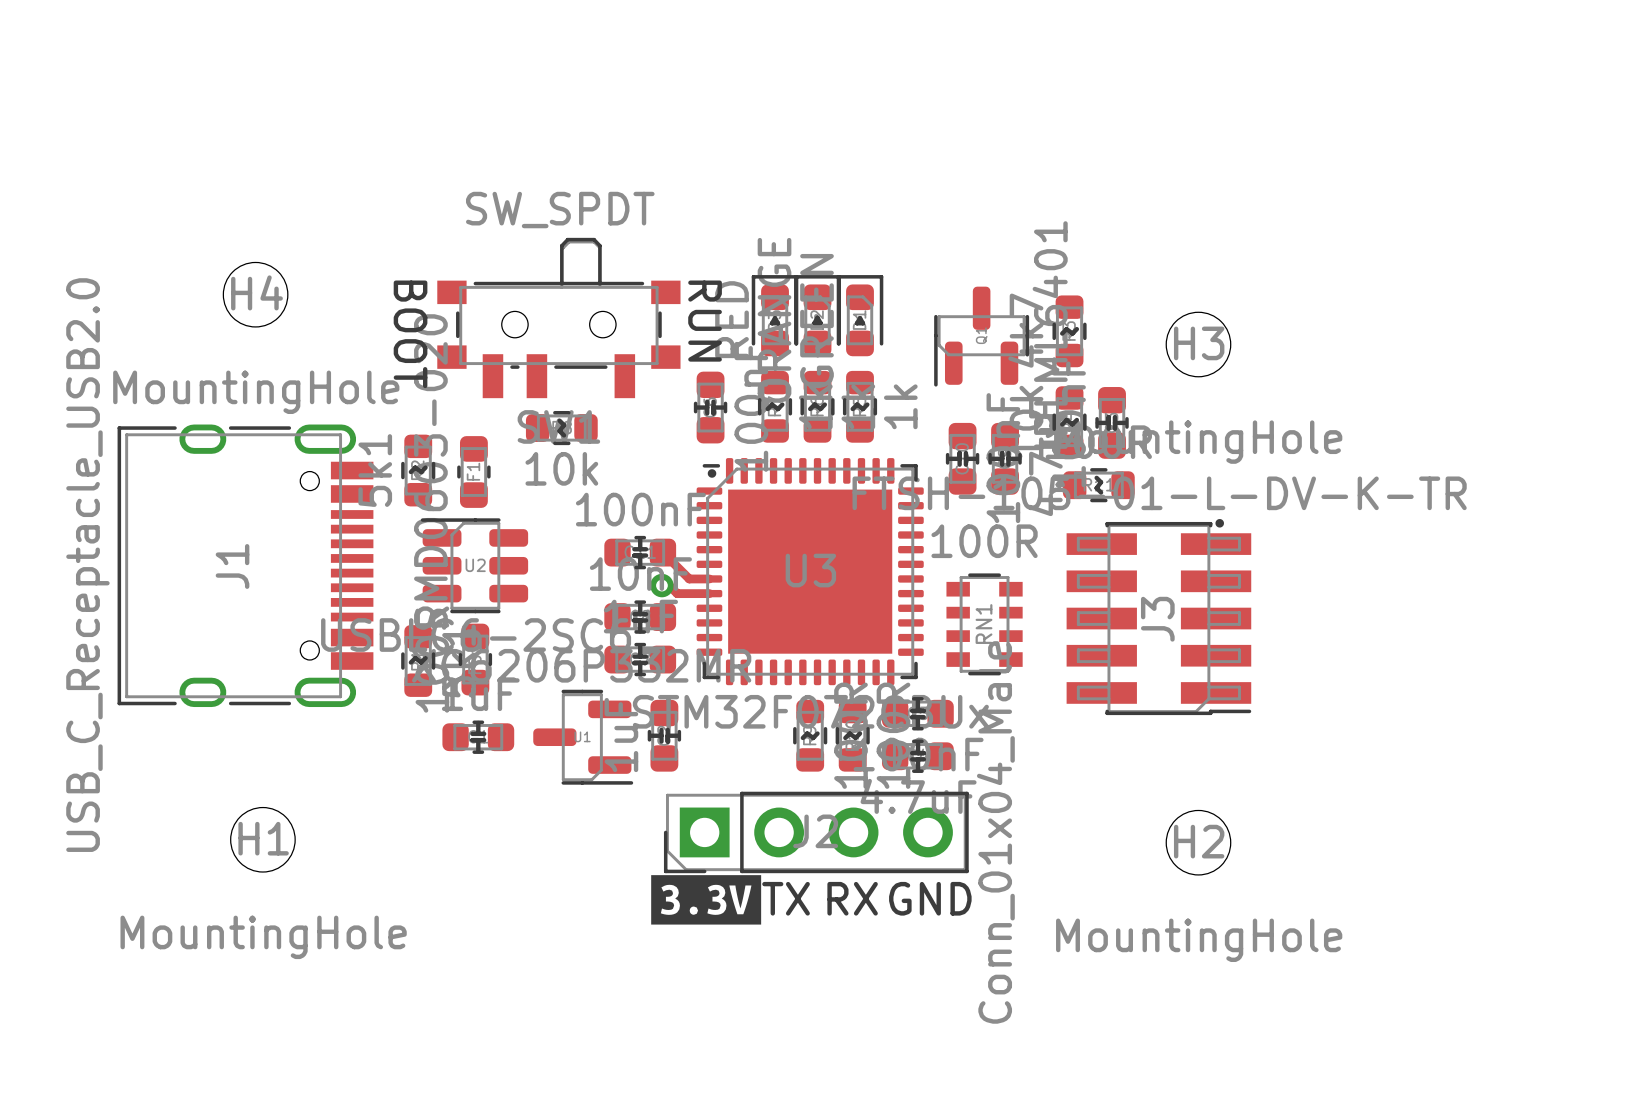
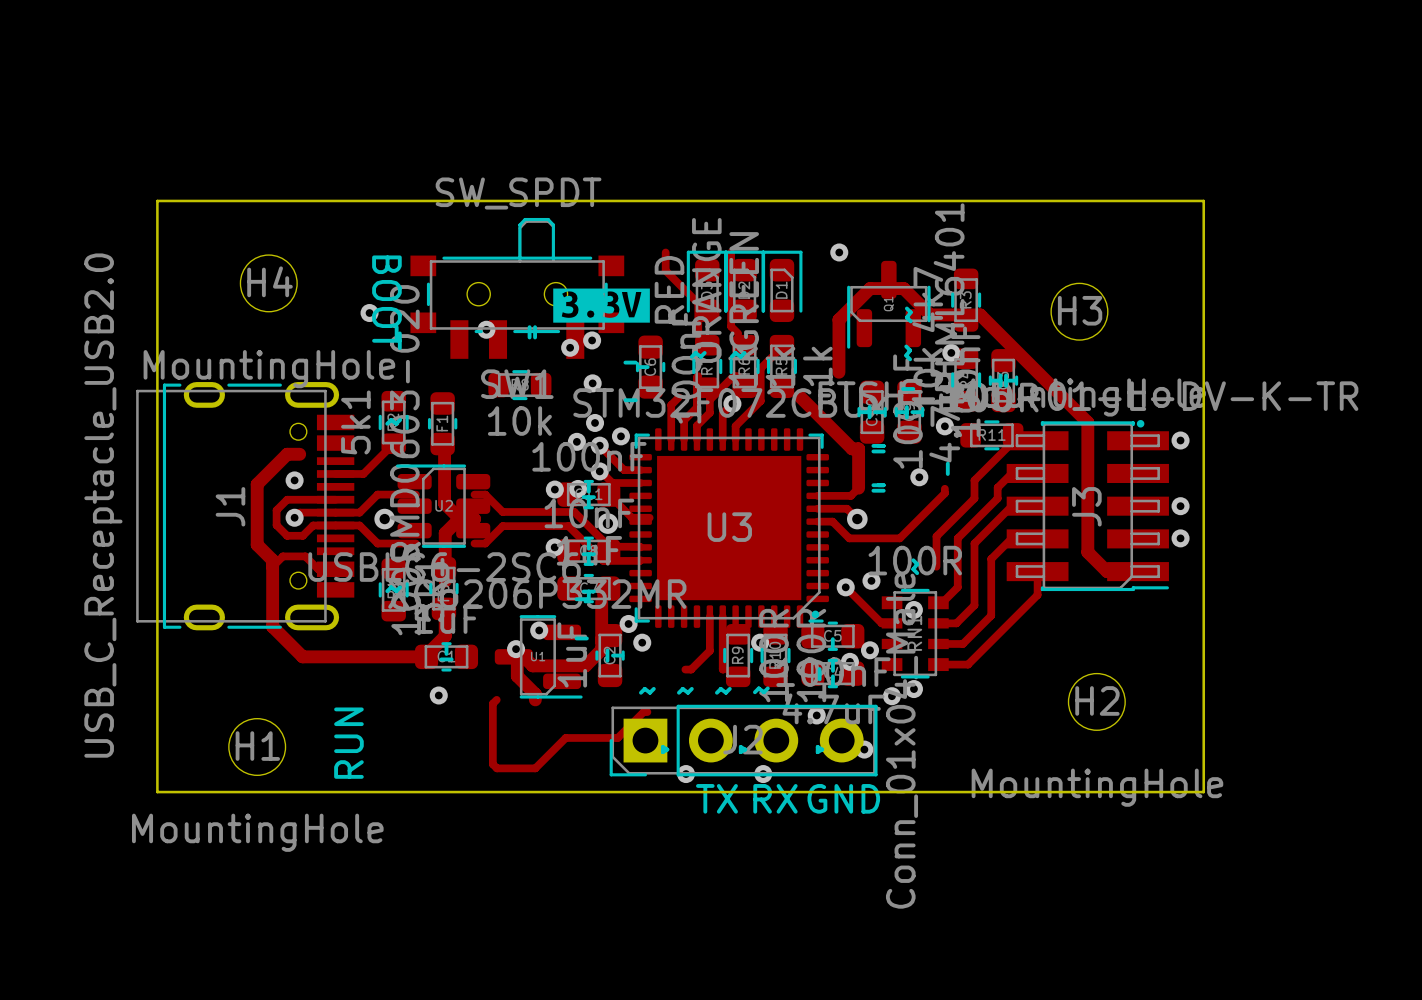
board edge: none -> (157, 200) (1203, 200) (1203, 792) (157, 792) (157, 200)
track: none -> (665, 252) (665, 270) (698, 303) (698, 333)
track: none -> (731, 252) (731, 326) (738, 333)
via: none -> (839, 252)
H4 position: (255, 294) -> (268, 283)
line: (817, 317) (814, 322) (820, 322) (817, 317) -> none
drawing: none -> [553, 288, 650, 323]
line: (775, 318) (777, 323) (772, 323) (775, 318) -> none
line: (860, 318) (857, 323) (862, 323) (860, 318) -> none
text rotation: 0° (705, 321) -> 180° (348, 743)
text position: RUN (705, 321) -> RUN (348, 743)
line: (1076, 329) (1072, 333) (1066, 329) (1062, 333) -> none
via: none -> (369, 313)
via: none -> (486, 329)
via: none -> (592, 340)
via: none -> (570, 347)
track: none -> (790, 347) (781, 347) (760, 368) (760, 401) (735, 426) (735, 439)
via: none -> (951, 352)
line: (707, 401) (707, 413) -> (529, 327) (529, 337)
line: (713, 401) (713, 413) -> (535, 327) (535, 337)
line: (782, 404) (777, 408) (772, 404) (767, 408) -> (704, 352) (700, 356) (695, 352) (691, 356)
line: (824, 404) (820, 408) (814, 404) (810, 408) -> (744, 352) (740, 356) (735, 352) (731, 356)
line: (867, 404) (862, 408) (857, 404) (852, 408) -> (691, 688) (687, 692) (682, 688) (678, 692)
line: (713, 407) (724, 407) -> none
track: none -> (838, 372) (838, 319) (870, 288) (903, 288) (930, 314) (980, 314) (1087, 422) (1087, 552) (1107, 571) (1138, 571)
track: none -> (698, 376) (696, 407) (684, 420) (684, 439)
track: none -> (738, 376) (733, 376) (709, 399) (709, 412) (696, 425) (696, 439)
line: (1076, 419) (1072, 424) (1066, 419) (1062, 424) -> (653, 688) (649, 692) (644, 688) (640, 692)
line: (559, 420) (564, 425) (559, 430) (564, 435) -> (906, 308) (910, 312) (906, 317) (910, 321)
J1 footprint: [117, 424, 374, 708] -> [136, 382, 355, 631]
via: none -> (592, 383)
line: none -> (903, 388) (913, 388)
track: none -> (678, 397) (671, 405) (671, 439)
track: none -> (800, 396) (852, 448) (858, 448) (858, 488) (850, 495) (817, 495)
track: none -> (732, 403) (722, 413) (722, 439)
via: none -> (732, 403)
line: (965, 452) (965, 464) -> (396, 327) (396, 337)
line: (1008, 452) (1008, 464) -> (947, 463) (947, 473)
drawing: [707, 469, 717, 478] -> none
via: none -> (595, 422)
via: none -> (944, 426)
line: (1096, 477) (1101, 482) (1096, 488) (1101, 492) -> (906, 346) (910, 350) (906, 355) (910, 359)
via: none -> (620, 436)
track: none -> (1037, 440) (1014, 440) (974, 480) (974, 498) (936, 536) (936, 566)
via: none -> (1180, 440)
via: none -> (576, 441)
track: none -> (443, 443) (444, 503) (460, 519)
track: none -> (393, 443) (363, 473) (335, 473)
track: none -> (599, 445) (624, 470) (640, 470)
via: none -> (599, 445)
track: none -> (299, 454) (287, 454) (257, 484) (257, 544) (272, 560) (272, 626) (302, 656) (424, 656) (445, 636) (445, 621)
drawing position: (1219, 523) -> (1140, 423)
track: none -> (599, 471) (612, 483) (640, 483)
via: none -> (599, 471)
track: none -> (1037, 473) (1011, 473) (997, 487) (997, 498) (957, 538) (957, 587) (942, 602) (938, 602)
via: none -> (919, 477)
via: none -> (294, 480)
track: none -> (944, 488) (944, 493) (899, 538) (849, 538) (832, 521) (817, 521)
via: none -> (554, 489)
via: none -> (578, 488)
line: (634, 549) (646, 549) -> (625, 400) (635, 400)
track: none -> (415, 494) (377, 494) (359, 512) (299, 512) (294, 517)
track: none -> (474, 494) (485, 494) (502, 511) (574, 511) (609, 546) (640, 547)
track: none -> (335, 499) (287, 499) (276, 510) (276, 525) (287, 535) (302, 535) (313, 525) (359, 525) (377, 543) (415, 543)
track: none -> (1037, 506) (1011, 506) (974, 543) (974, 605) (956, 623) (938, 623)
via: none -> (1180, 506)
track: none -> (817, 508) (847, 508) (857, 519)
U3 rotation: 0° (810, 571) -> 180° (729, 528)
via: none -> (294, 517)
via: none -> (384, 519)
track: none -> (474, 519) (459, 519) (445, 533) (445, 581)
via: none -> (857, 519)
track: (661, 585) (669, 585) (677, 593) (709, 593) -> none
track: none -> (1037, 538) (1011, 538) (991, 558) (991, 615) (962, 643) (938, 643)
via: none -> (1180, 538)
track: none -> (474, 543) (485, 543) (502, 526) (568, 526) (603, 560) (640, 560)
via: none -> (554, 547)
line: (634, 614) (646, 614) -> (576, 638) (586, 638)
J3 position: (1158, 618) -> (1087, 506)
RN1 position: (984, 624) -> (915, 633)
line: none -> (913, 560) (917, 564) (913, 569) (917, 573)
track: none -> (272, 566) (282, 556) (305, 556) (318, 569) (335, 569)
track: none -> (1037, 571) (1037, 595) (968, 664) (938, 664)
line: (640, 645) (640, 656) -> none
via: none -> (871, 580)
line: (634, 656) (646, 656) -> (576, 599) (586, 599)
track: none -> (845, 587) (881, 623) (892, 623)
via: none -> (845, 587)
track: none -> (601, 602) (601, 649) (585, 665) (532, 665) (516, 649)
via: none -> (913, 609)
drawing: none -> [811, 610, 820, 619]
track: none -> (709, 616) (709, 650) (691, 669) (685, 669)
track: none -> (722, 616) (723, 669)
via: none -> (628, 623)
line: (917, 699) (917, 710) -> none
via: none -> (539, 630)
line: (912, 710) (923, 710) -> (873, 485) (883, 485)
line: (912, 717) (923, 717) -> (873, 490) (883, 490)
via: none -> (642, 642)
via: none -> (760, 642)
via: none -> (516, 649)
track: none -> (517, 650) (517, 676) (535, 694) (535, 699)
line: (667, 729) (667, 741) -> (819, 669) (819, 679)
via: none -> (870, 650)
line: (472, 733) (484, 733) -> (625, 362) (635, 362)
line: (817, 733) (813, 737) (807, 733) (802, 737) -> (729, 688) (725, 692) (720, 688) (716, 692)
line: (860, 733) (855, 737) (849, 733) (845, 737) -> (767, 688) (763, 692) (758, 688) (754, 692)
line: (650, 735) (661, 735) -> none
line: (478, 740) (478, 751) -> none
via: none -> (849, 661)
line: (912, 753) (923, 753) -> (873, 445) (883, 445)
line: (912, 759) (923, 759) -> (873, 451) (883, 451)
via: none -> (913, 689)
via: none -> (438, 695)
via: none -> (891, 696)
track: none -> (496, 699) (492, 703) (492, 764) (496, 768) (535, 768) (565, 737) (617, 737) (643, 712) (647, 712)
via: none -> (816, 715)
line: none -> (662, 747) (667, 749) (662, 752) (662, 747)
line: none -> (740, 747) (745, 749) (740, 752) (740, 747)
line: none -> (817, 747) (817, 752) (822, 749) (817, 747)
via: none -> (864, 749)
H2 position: (1198, 842) -> (1096, 701)
via: none -> (686, 774)
via: none -> (763, 774)
drawing: [651, 875, 762, 925] -> none

